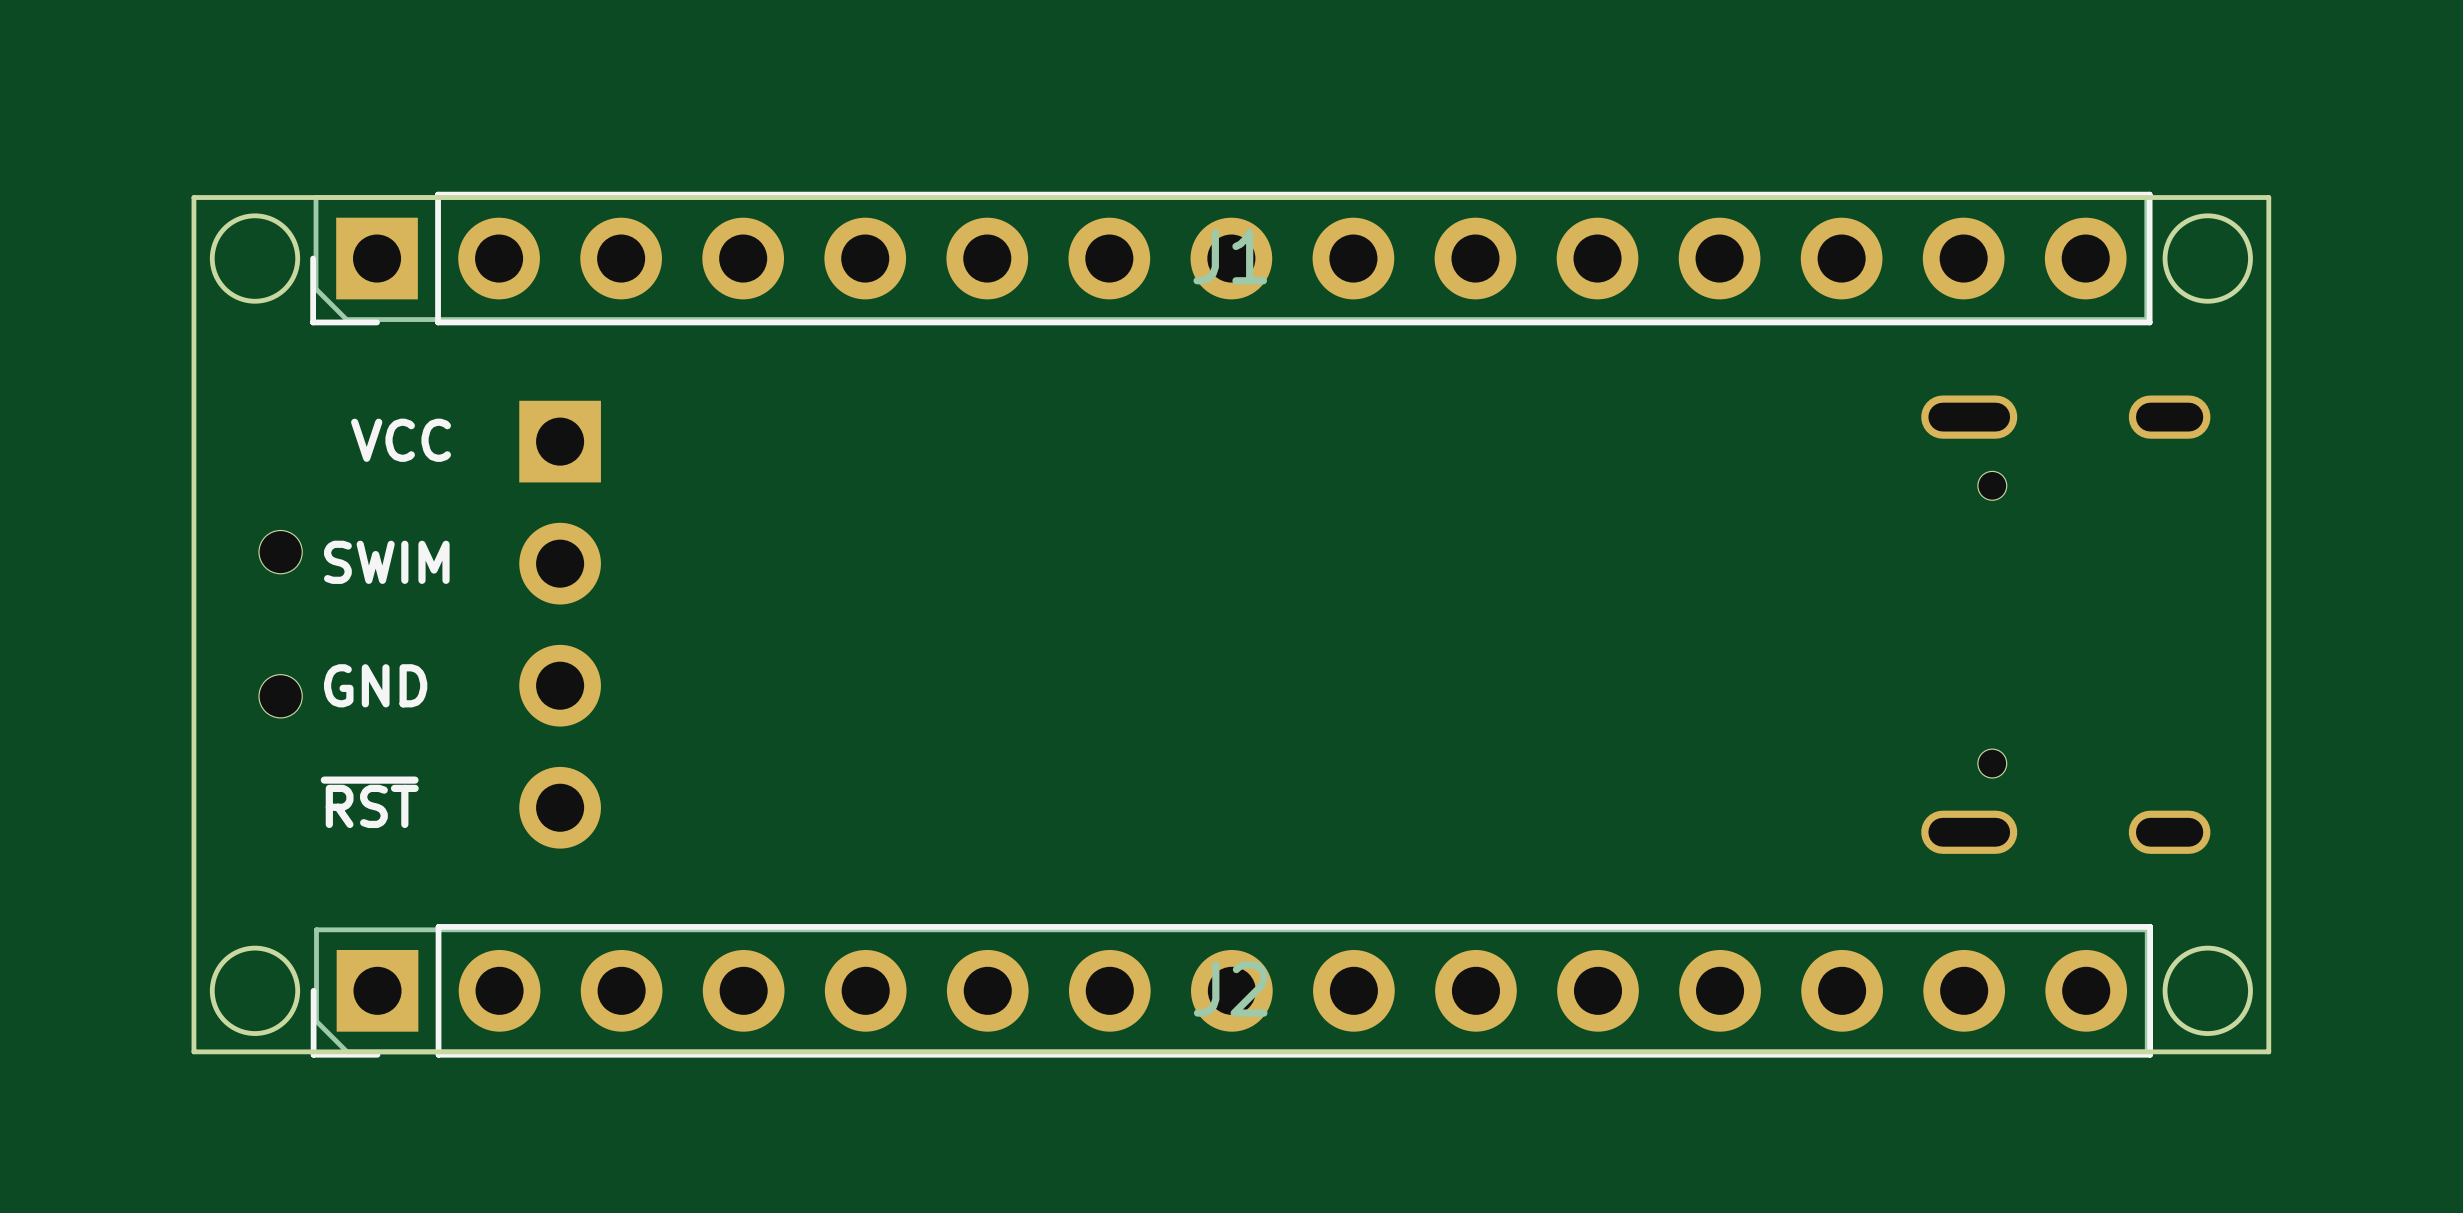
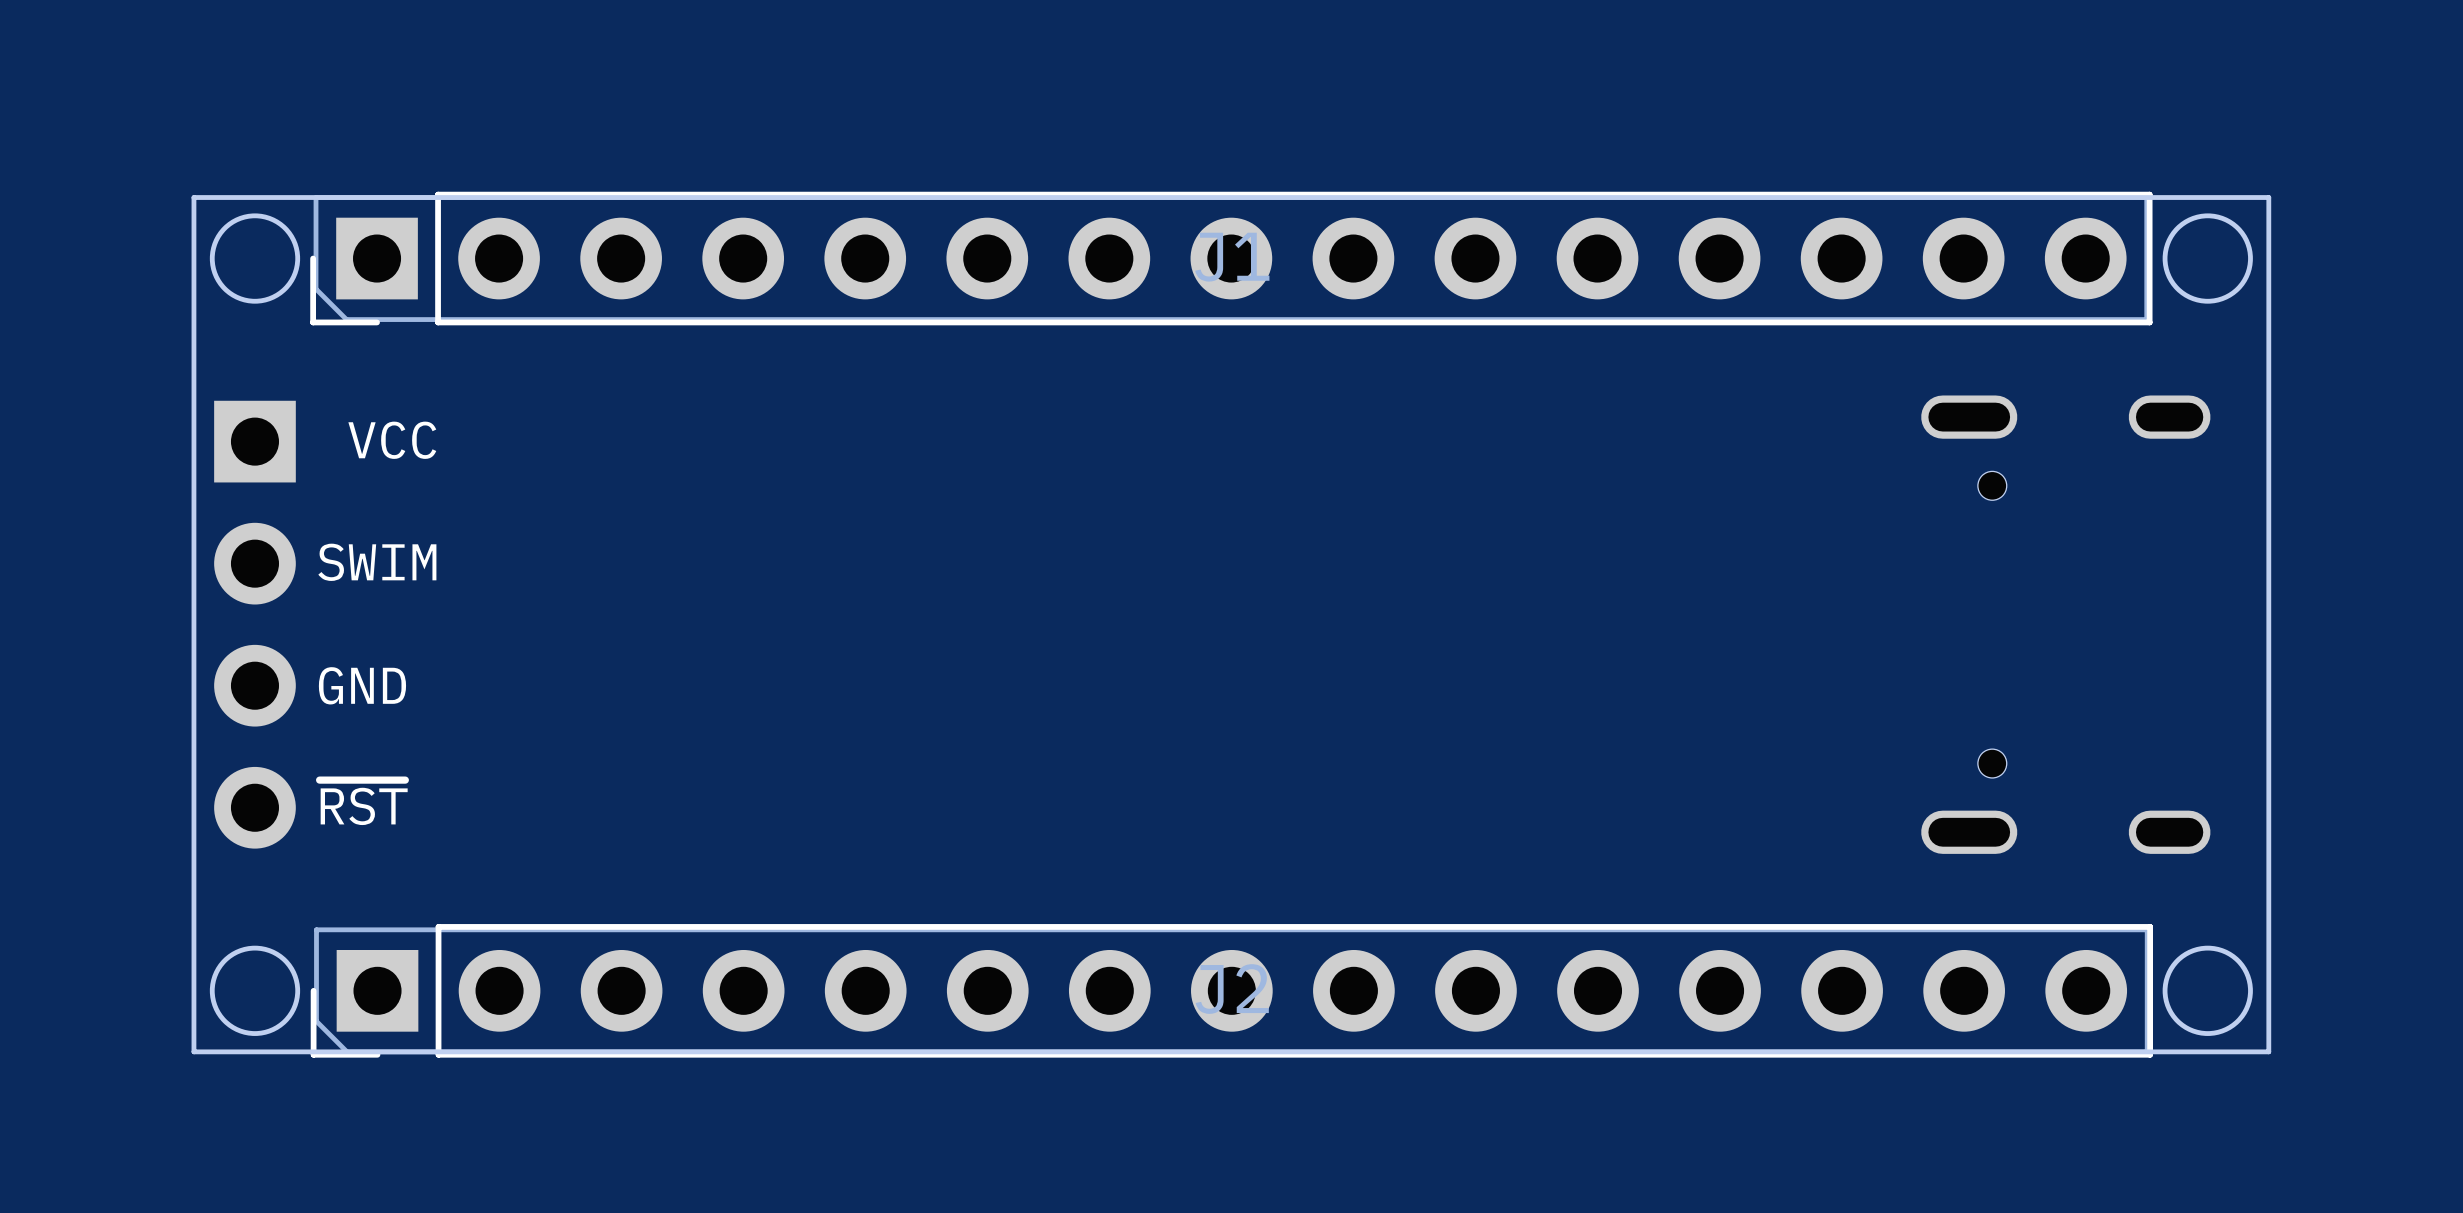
part footprint: [259, 530, 303, 718] -> [214, 400, 296, 849]
part: (560, 624) -> none

